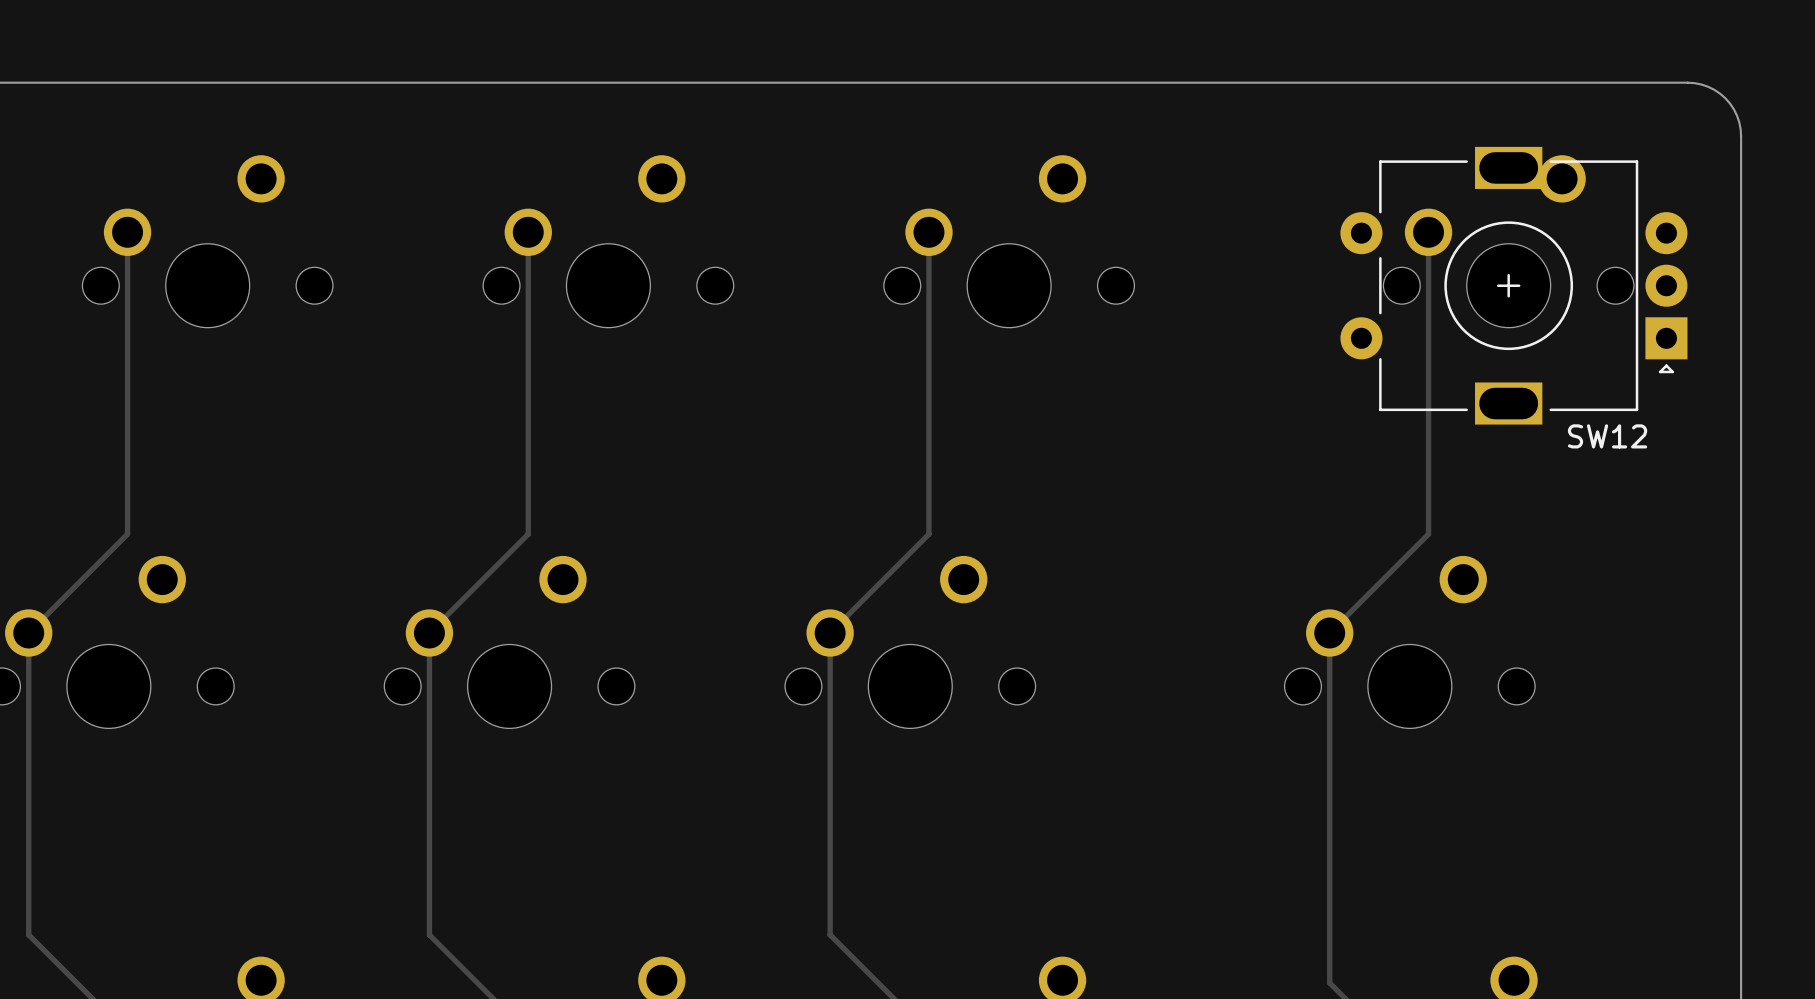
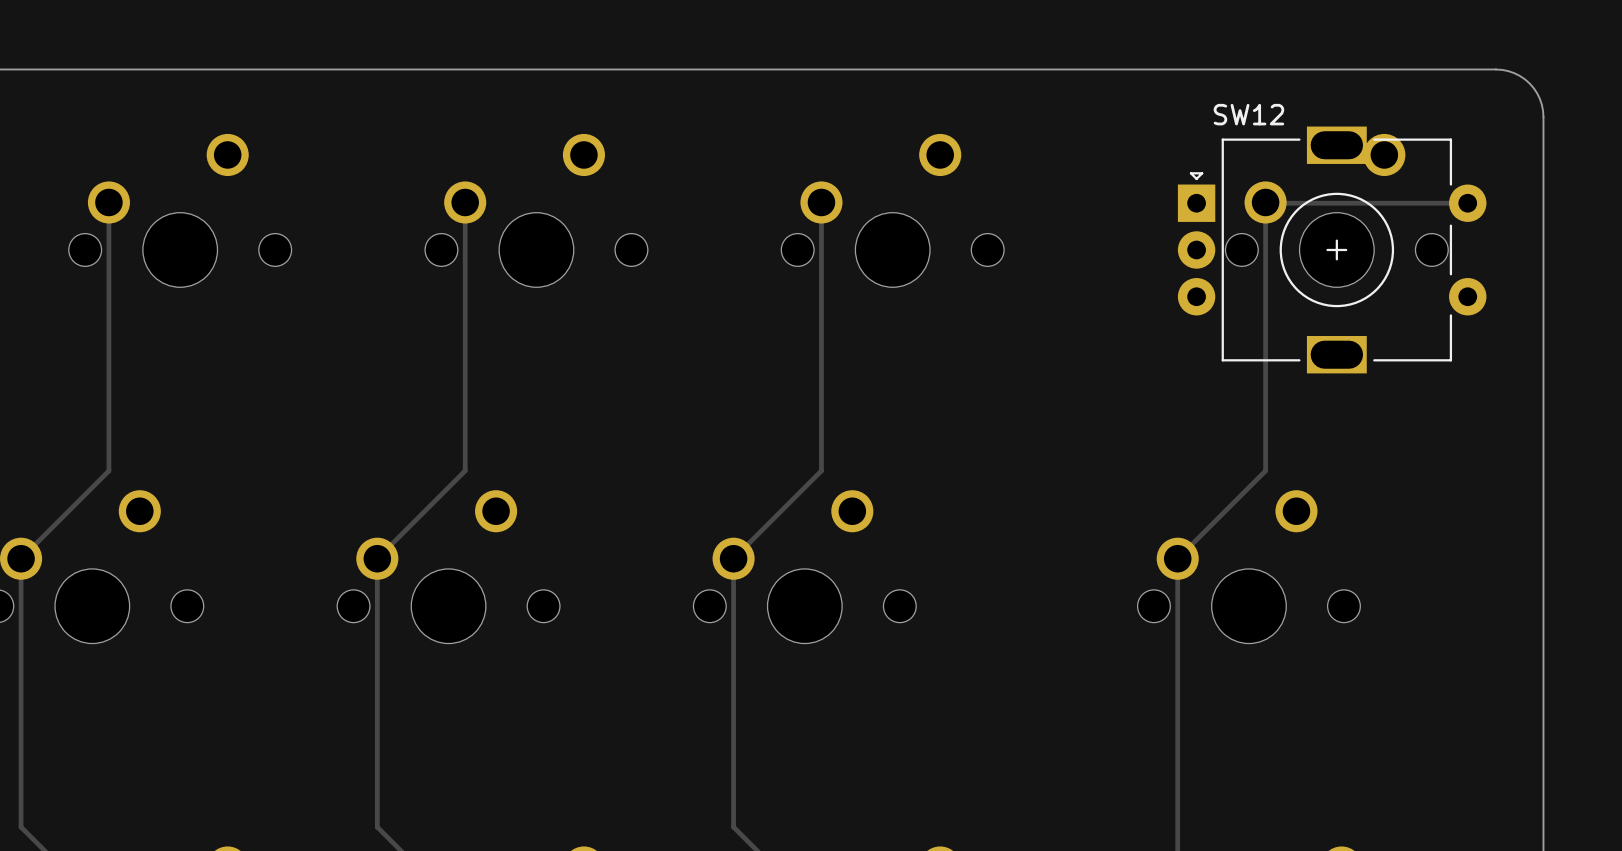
track: none -> (1266, 203) (1467, 203)
SW12 rotation: 0° (1513, 285) -> 180° (1332, 249)

